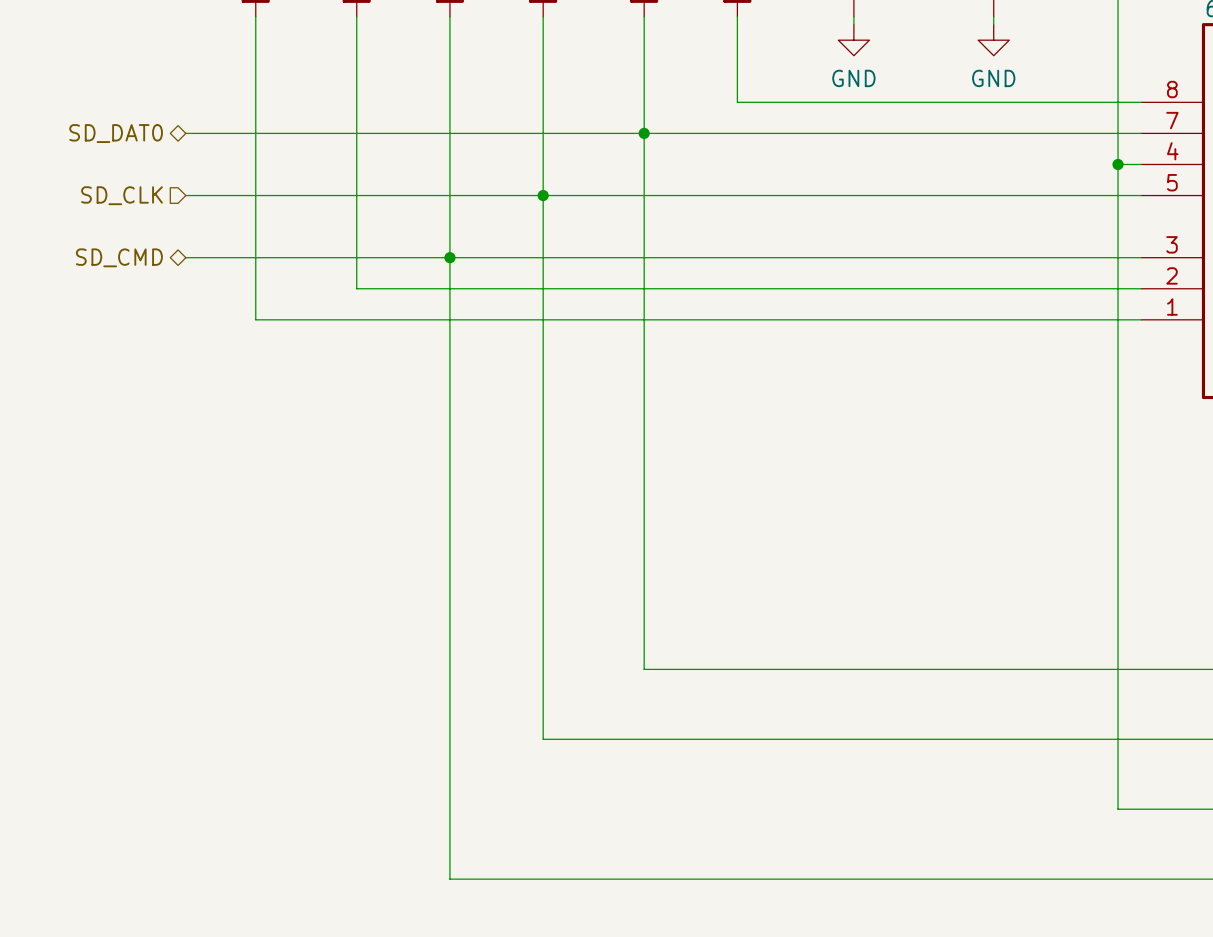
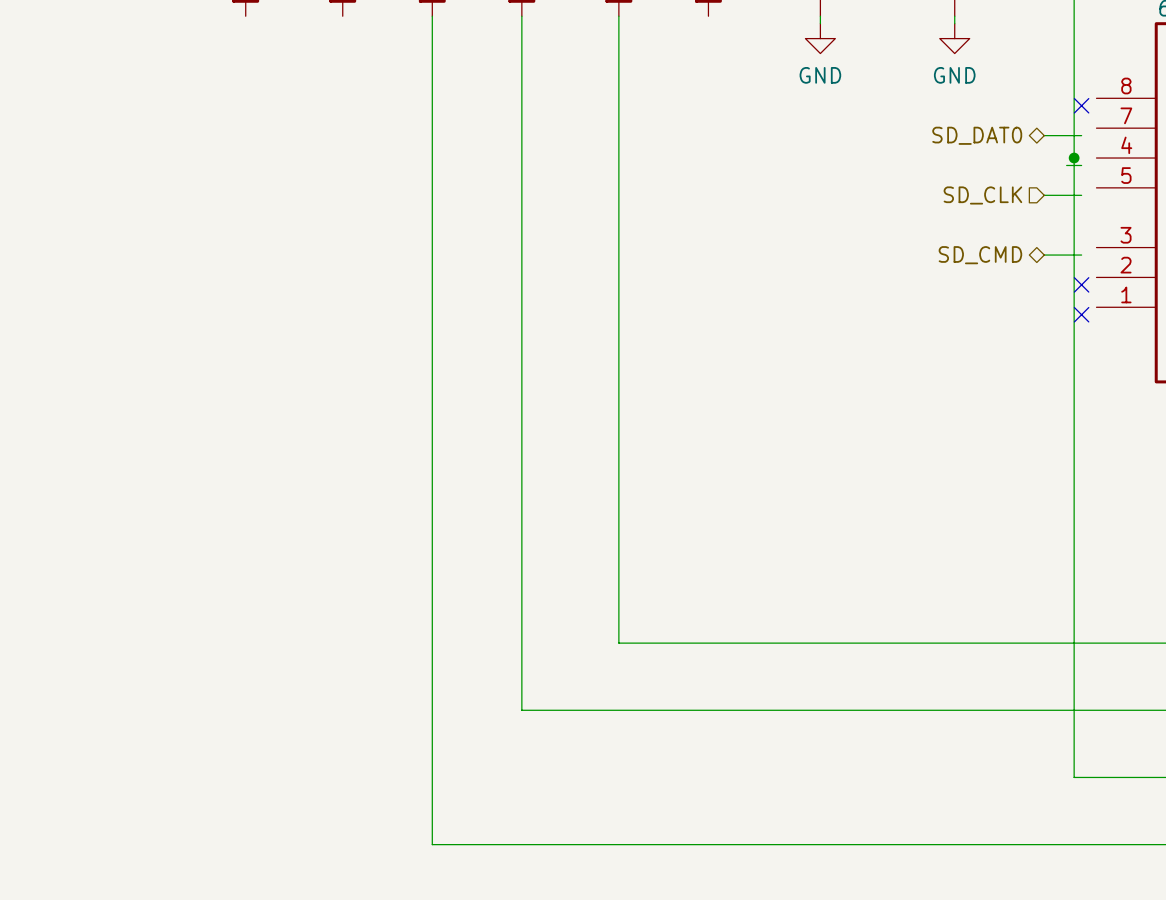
wire: (255, 16) (255, 319) (1141, 319) -> none
wire: (356, 16) (356, 288) (1141, 288) -> none
wire: (737, 16) (737, 102) (1141, 102) -> none
no-connect mark: none -> (1081, 105)
hierarchical label: SD_DAT0 (116, 133) -> none
wire: (185, 133) (1141, 133) -> none
junction: (644, 133) -> none
hierarchical label: none -> SD_DAT0 (977, 135)
wire: none -> (1044, 135) (1081, 135)
wire: (1118, 164) (1141, 164) -> none
wire: none -> (1066, 165) (1081, 165)
hierarchical label: SD_CLK (121, 195) -> none
wire: (185, 195) (1141, 195) -> none
junction: (543, 195) -> none
hierarchical label: none -> SD_CLK (982, 195)
wire: none -> (1044, 195) (1081, 195)
hierarchical label: SD_CMD (119, 257) -> none
wire: (185, 257) (1141, 257) -> none
junction: (449, 257) -> none
hierarchical label: none -> SD_CMD (980, 255)
wire: none -> (1044, 255) (1081, 255)
no-connect mark: none -> (1081, 284)
no-connect mark: none -> (1081, 314)

